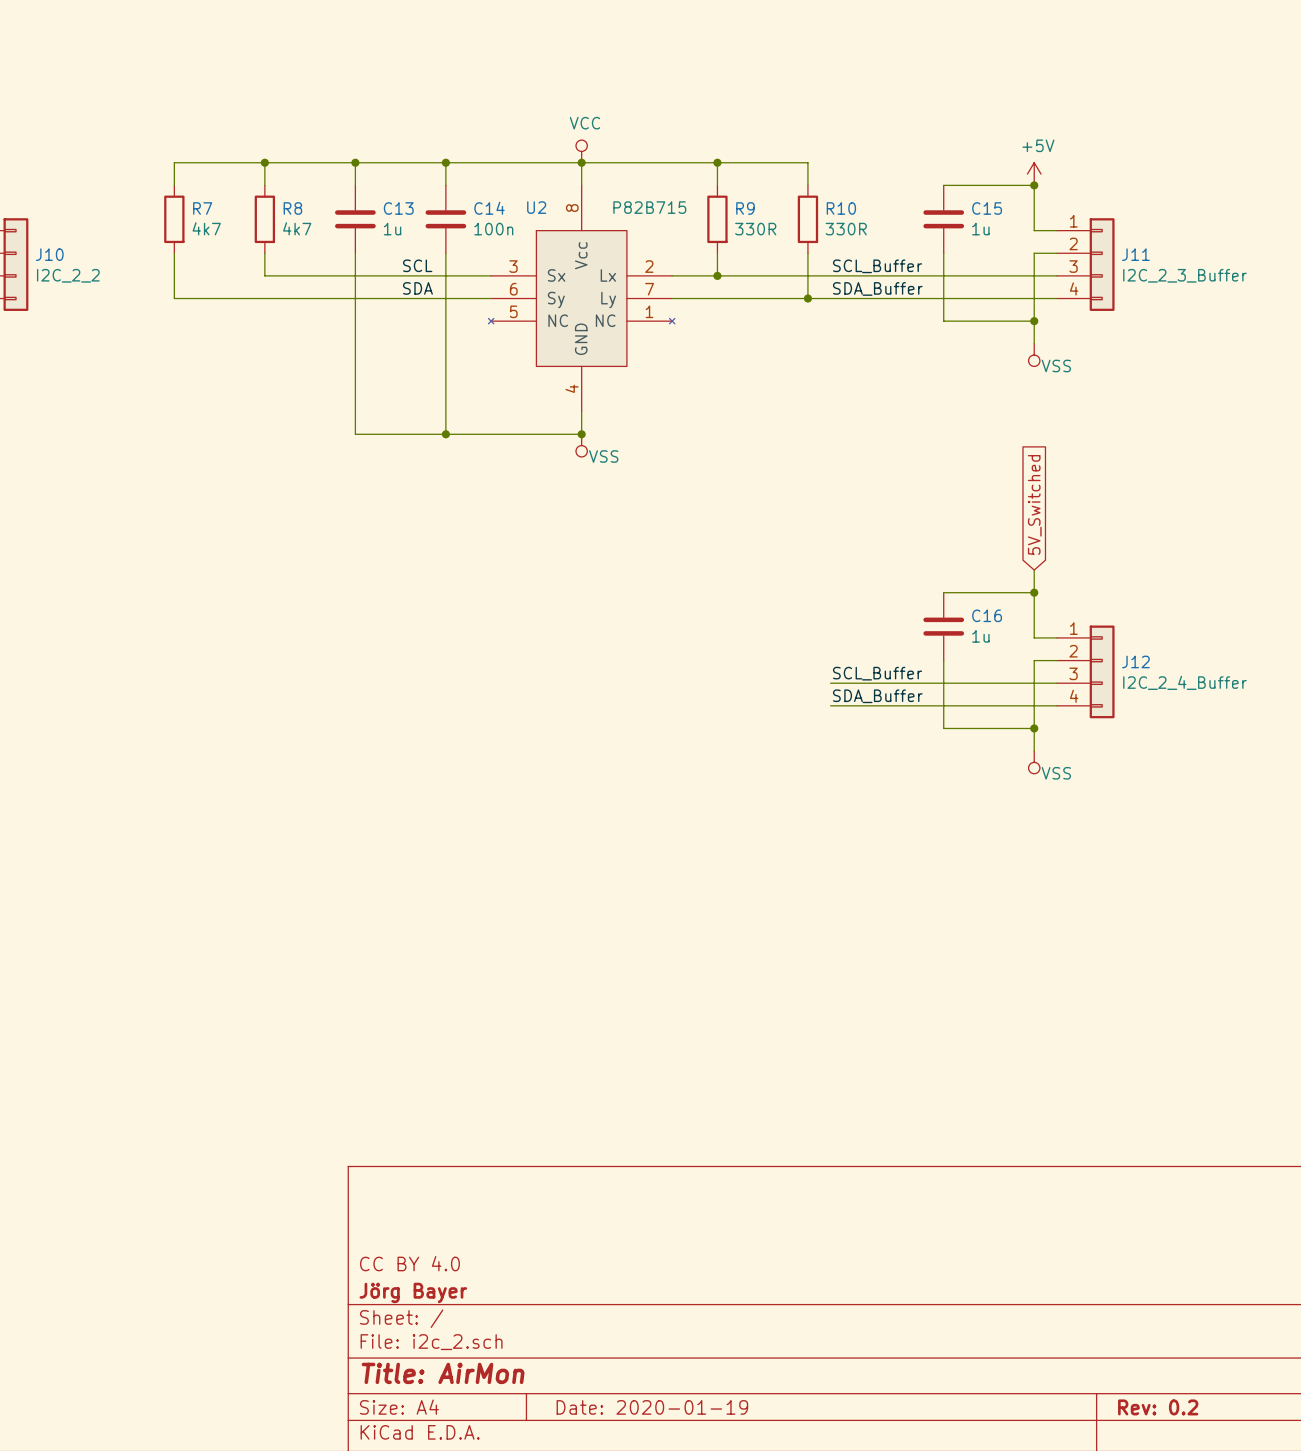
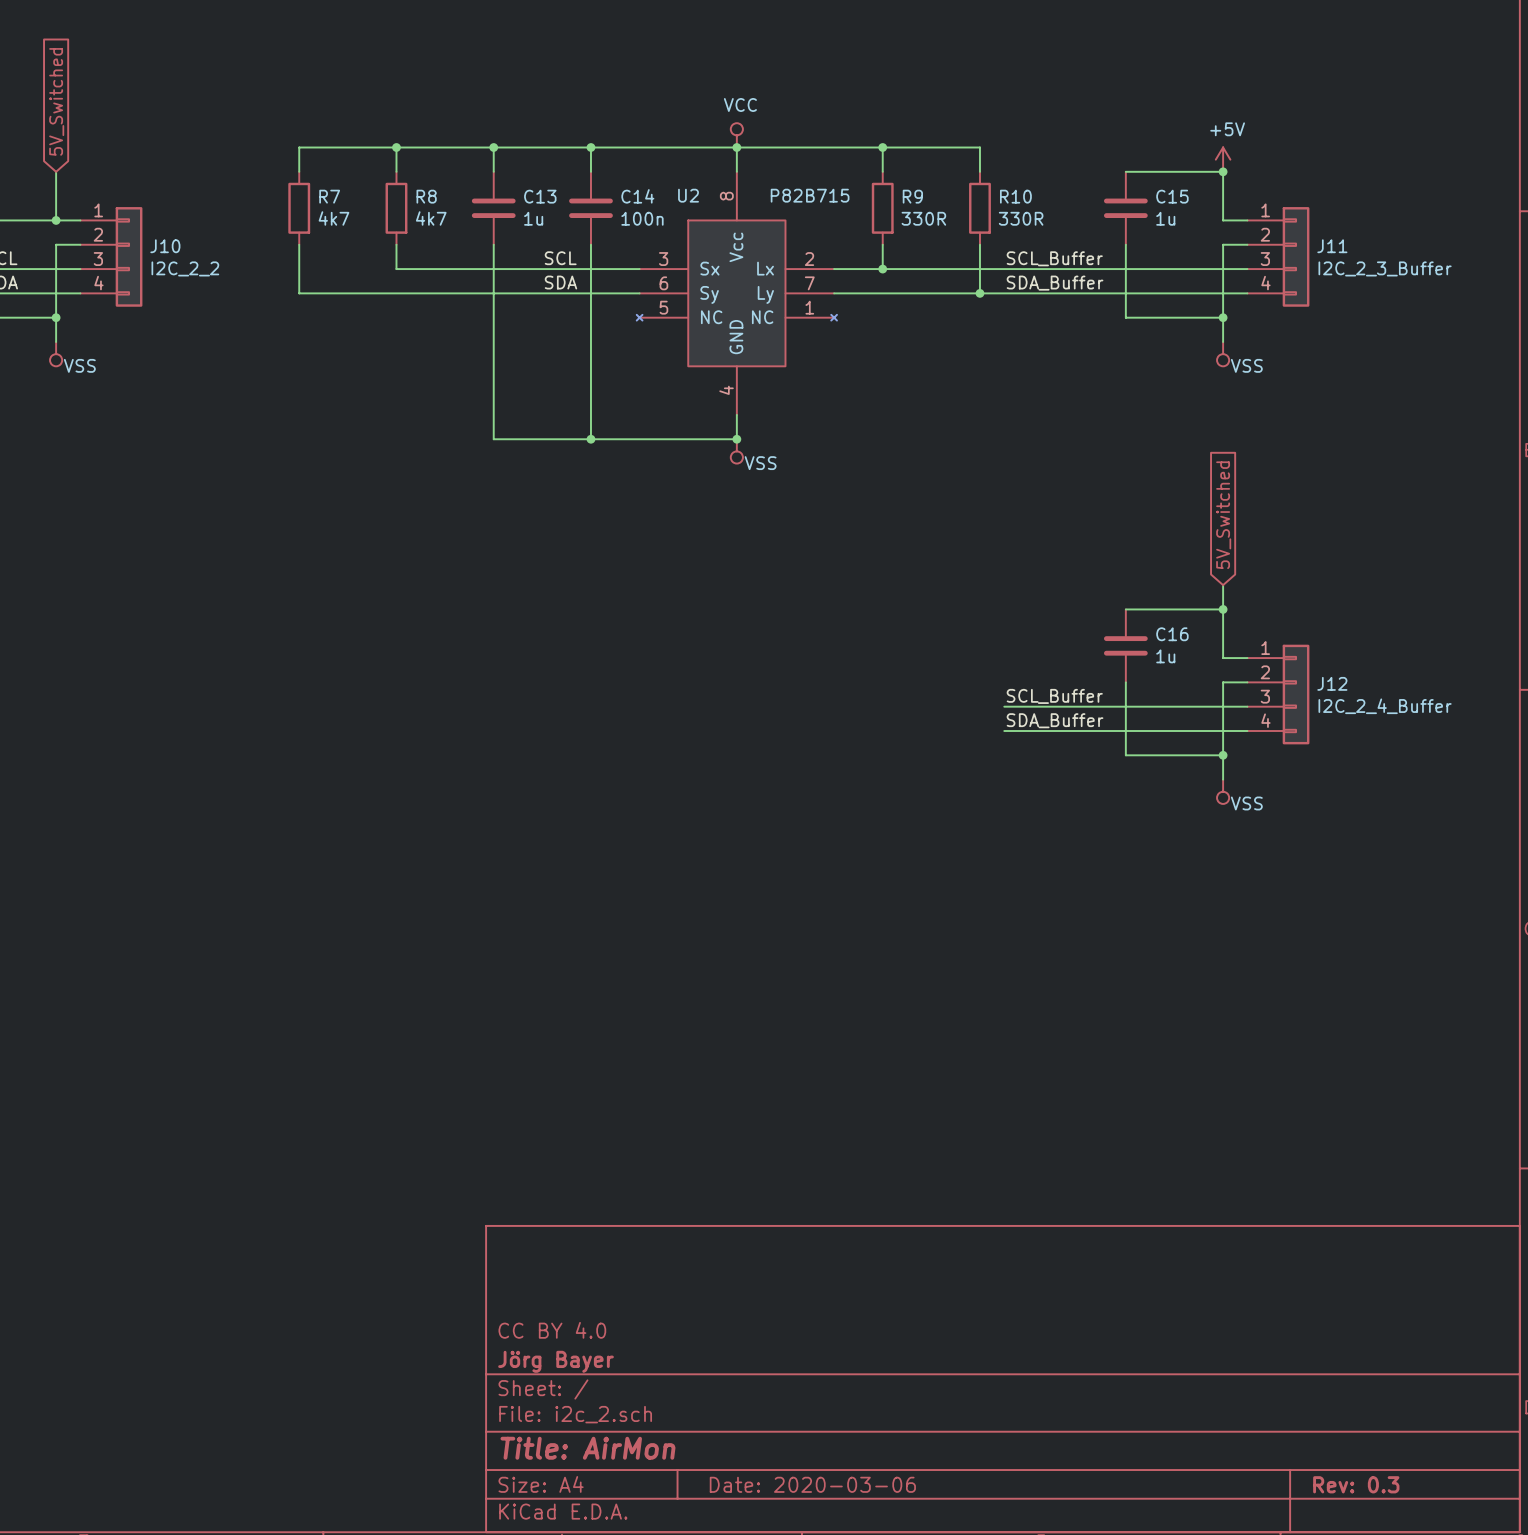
title block: Date: 2020-01-19 (652, 1407) -> Date: 2020-03-06 (812, 1484)
title block: Rev: 0.2 (1158, 1407) -> Rev: 0.3 (1356, 1484)

